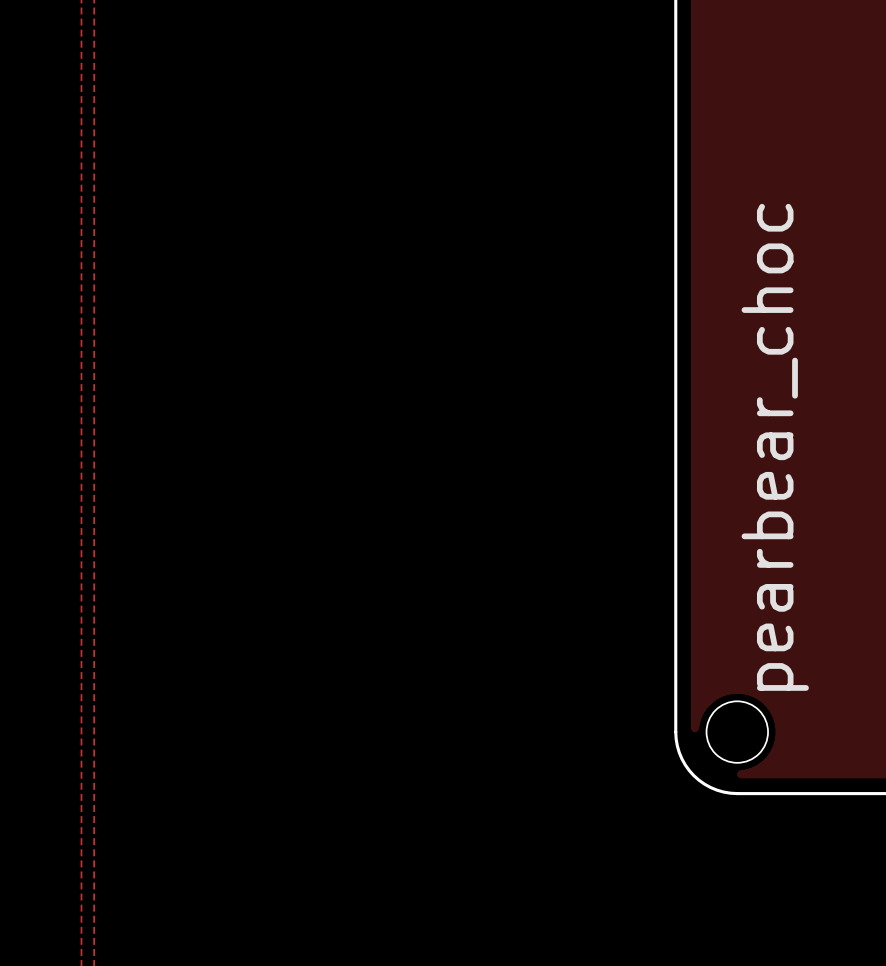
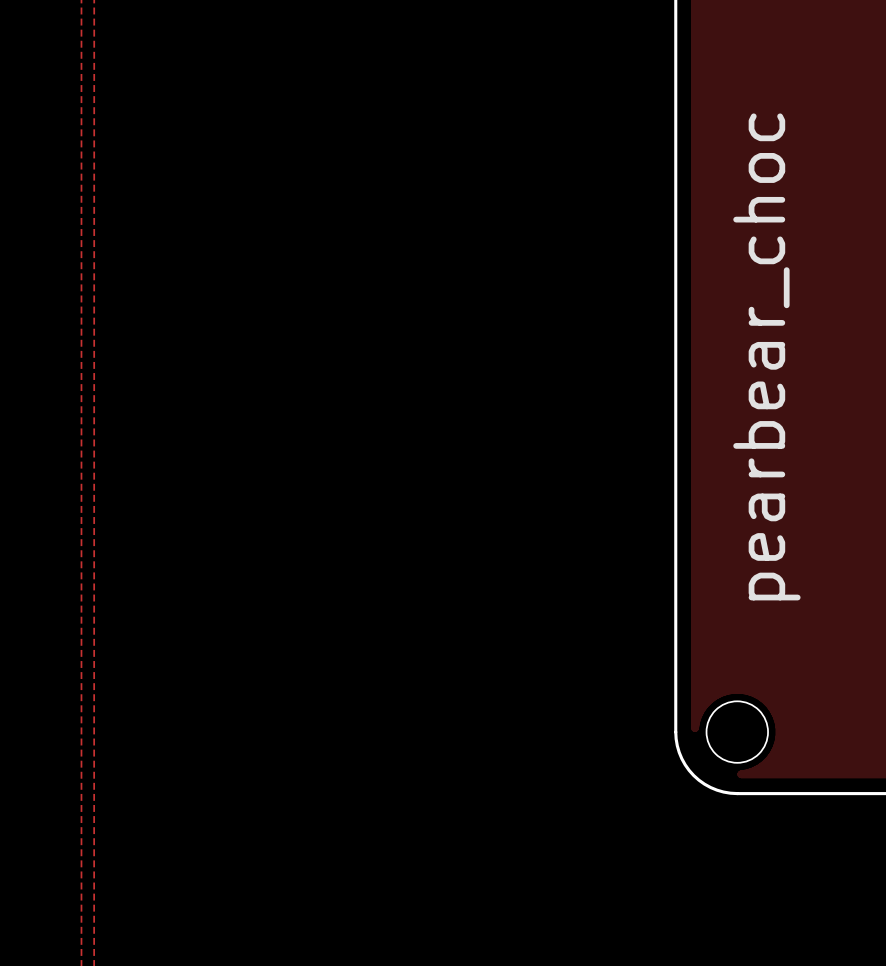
text position: pearbear_choc (775, 447) -> pearbear_choc (766, 356)

